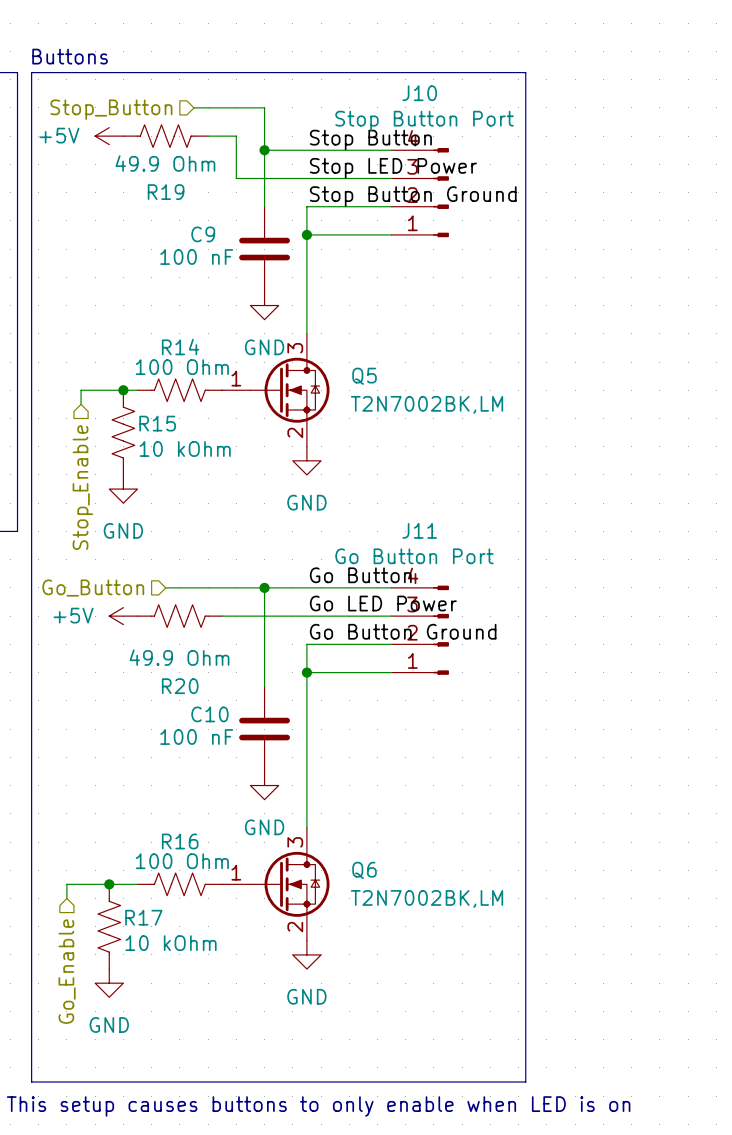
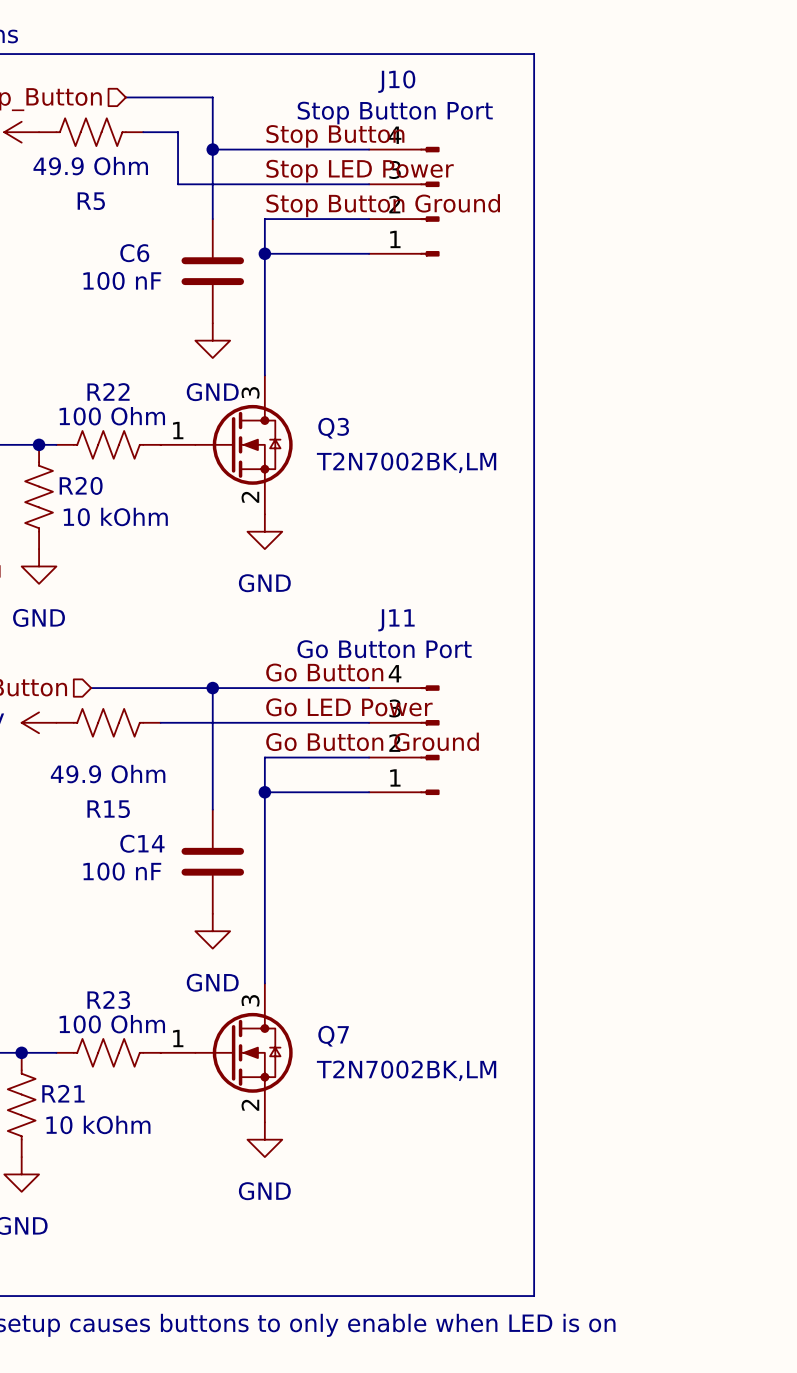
R19 name: R19 (166, 192) -> R5 (91, 201)
C9 name: C9 (203, 234) -> C6 (134, 253)
R14 name: R14 (180, 347) -> R22 (108, 391)
Q5 name: Q5 (364, 376) -> Q3 (333, 428)
R15 name: R15 (157, 423) -> R20 (81, 485)
R20 name: R20 (180, 686) -> R15 (108, 809)
C10 name: C10 (209, 714) -> C14 (142, 843)
R16 name: R16 (180, 841) -> R23 (108, 1000)
Q6 name: Q6 (364, 870) -> Q7 (333, 1036)
R17 name: R17 (143, 917) -> R21 (63, 1093)

